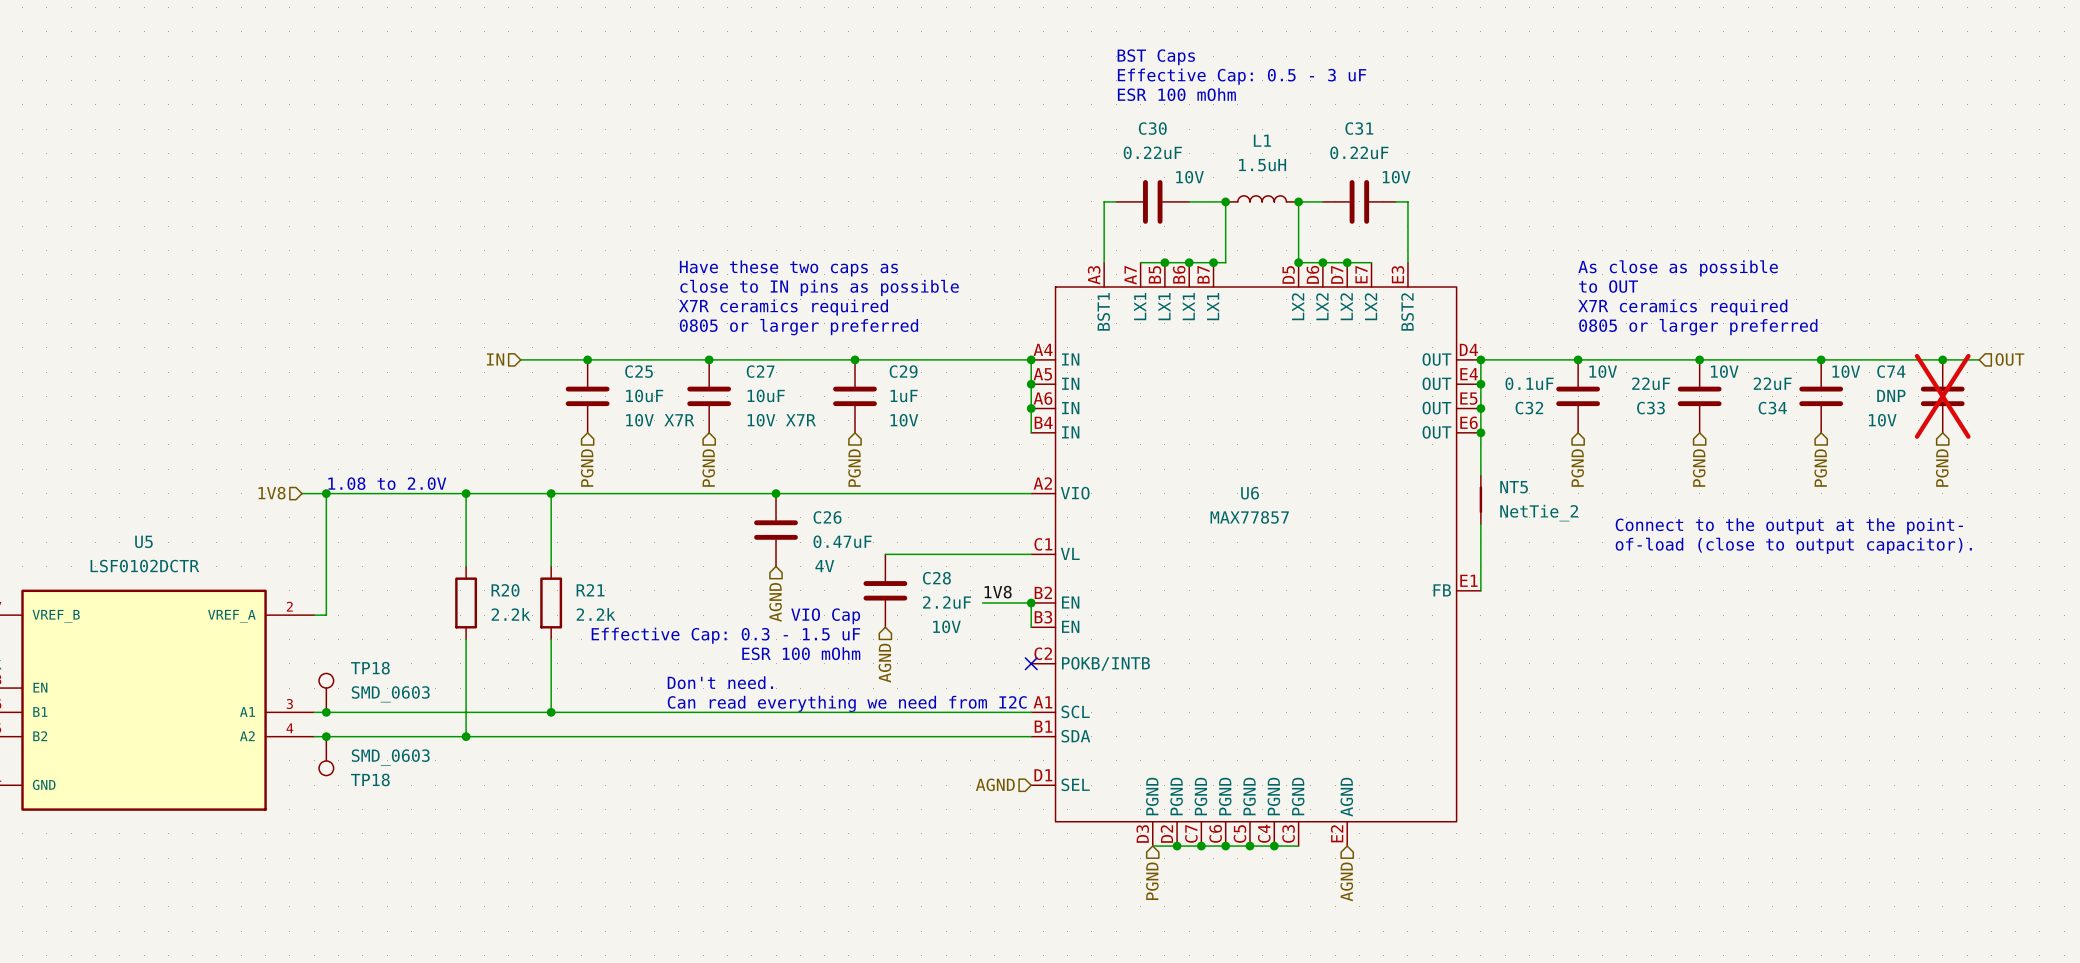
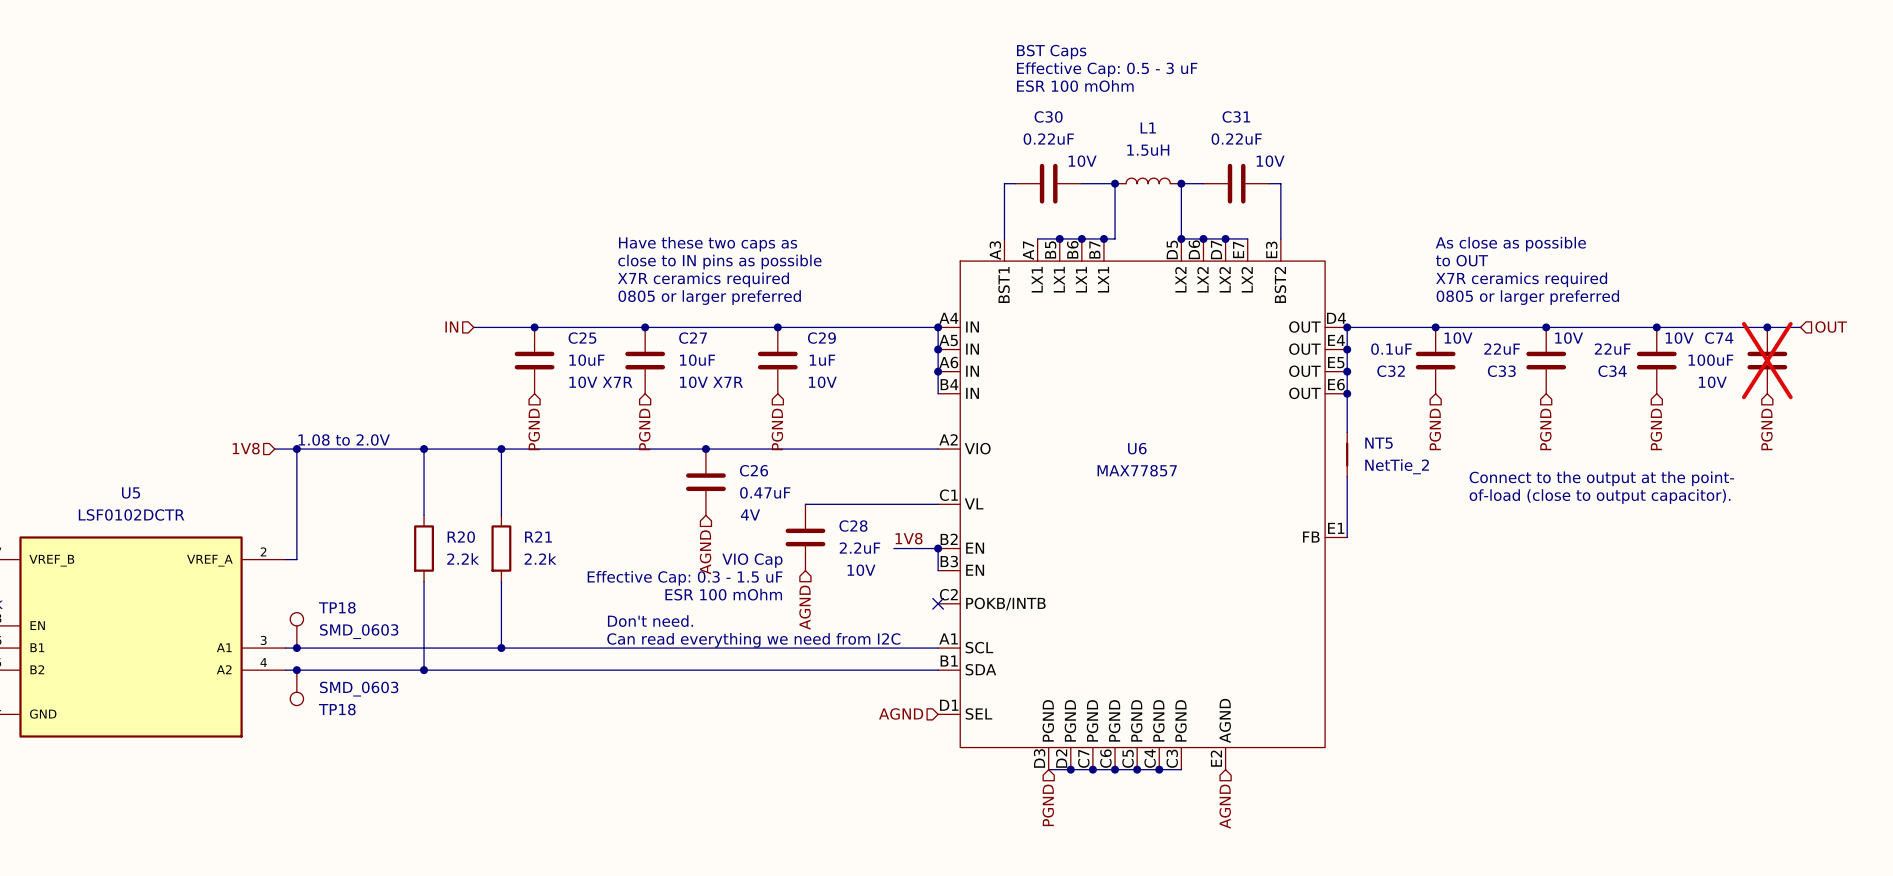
C74 value: DNP (1891, 395) -> 100uF (1710, 360)

